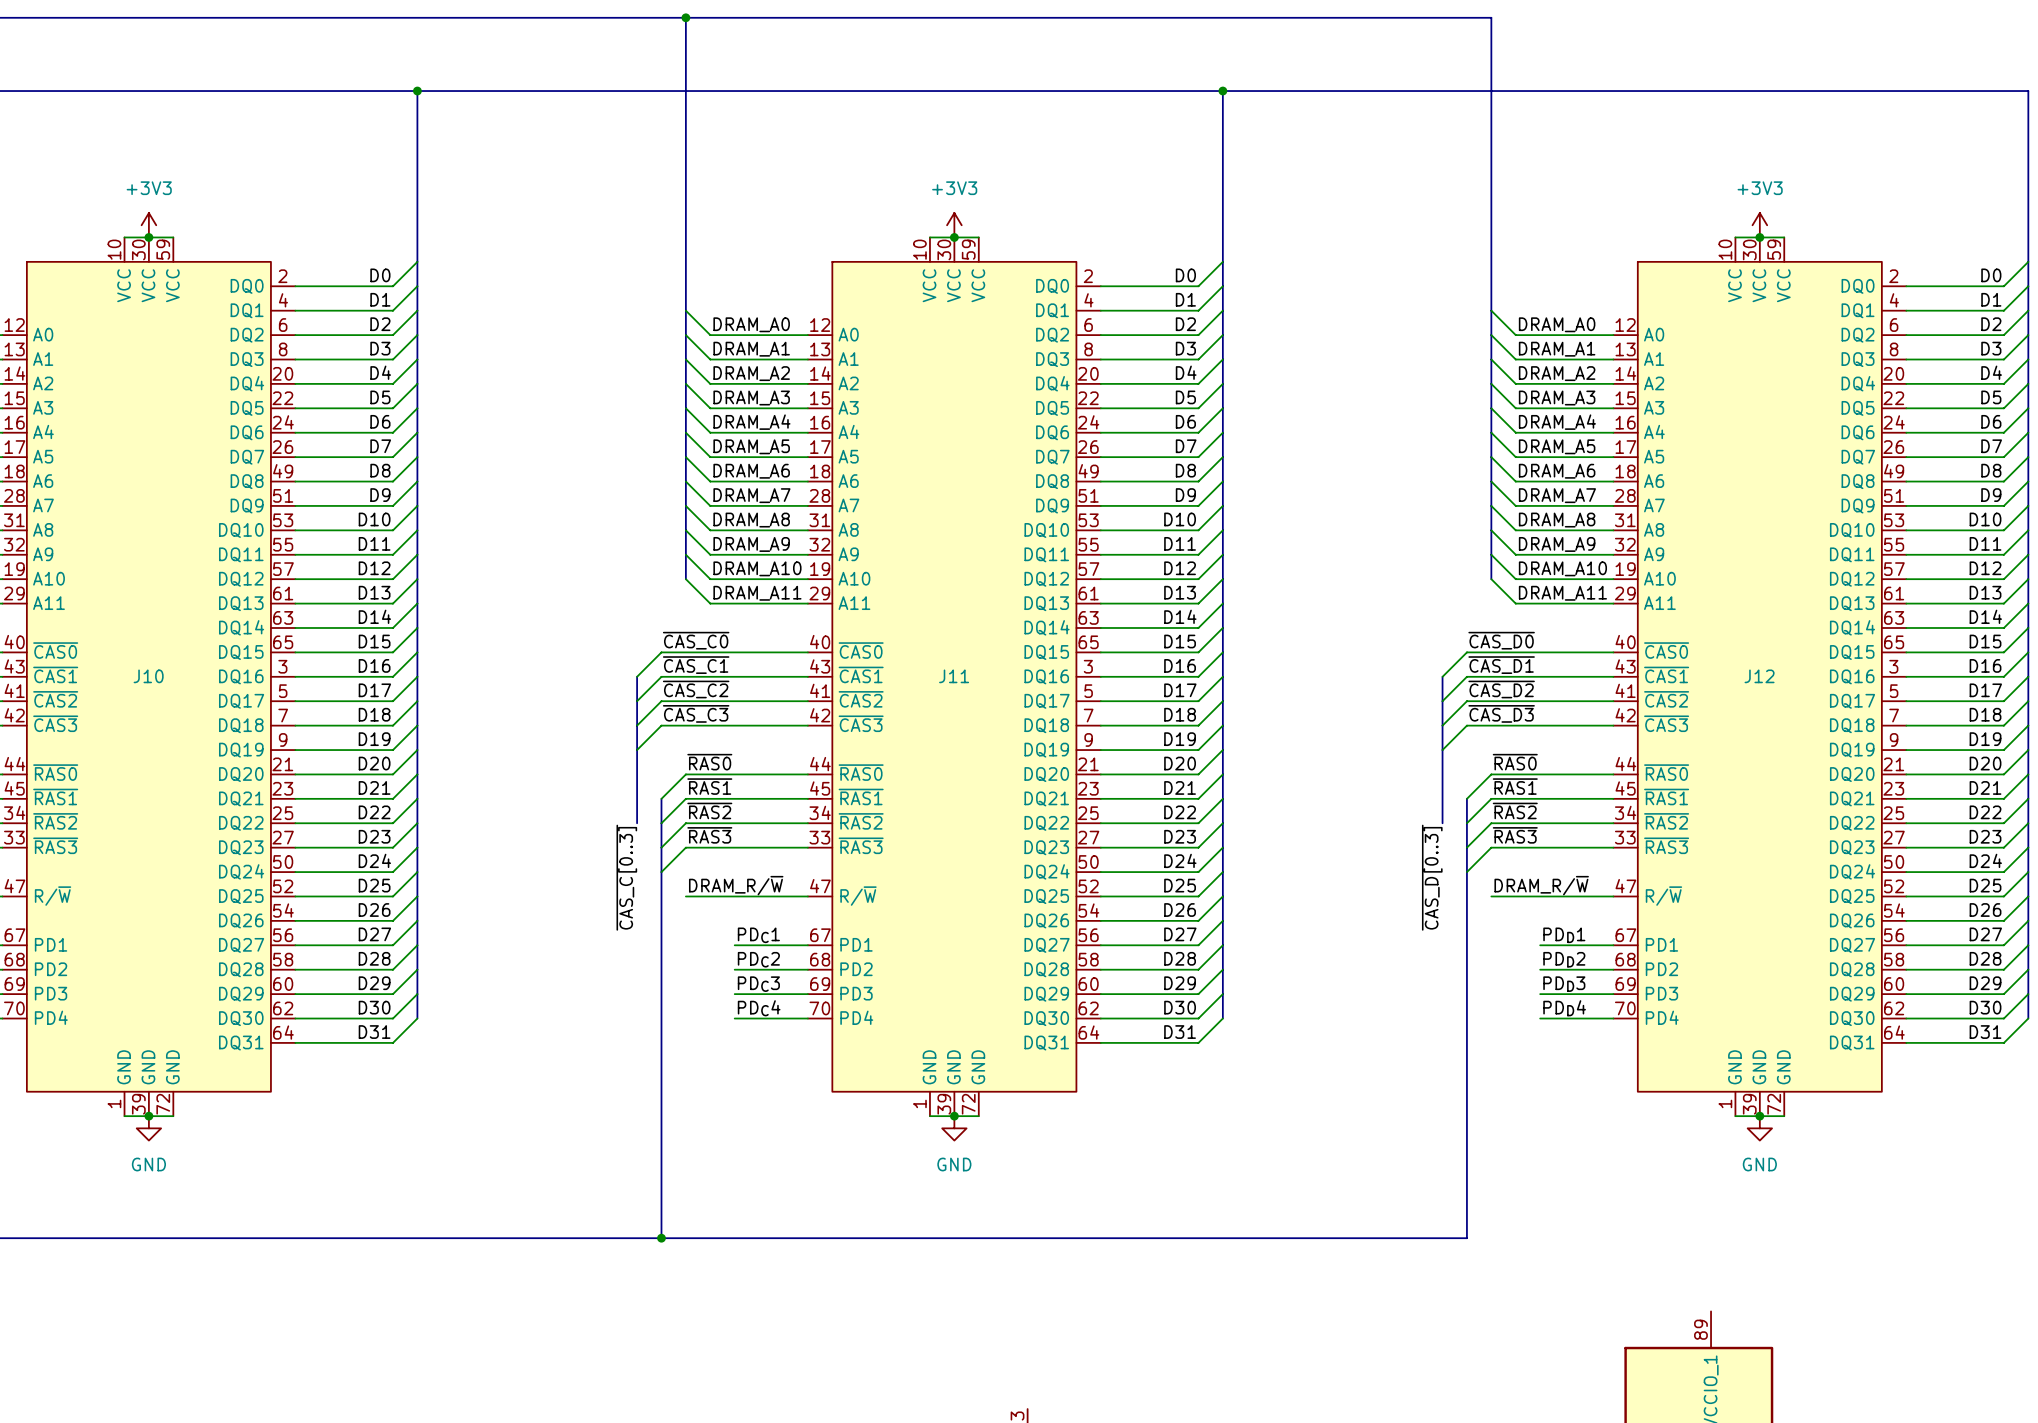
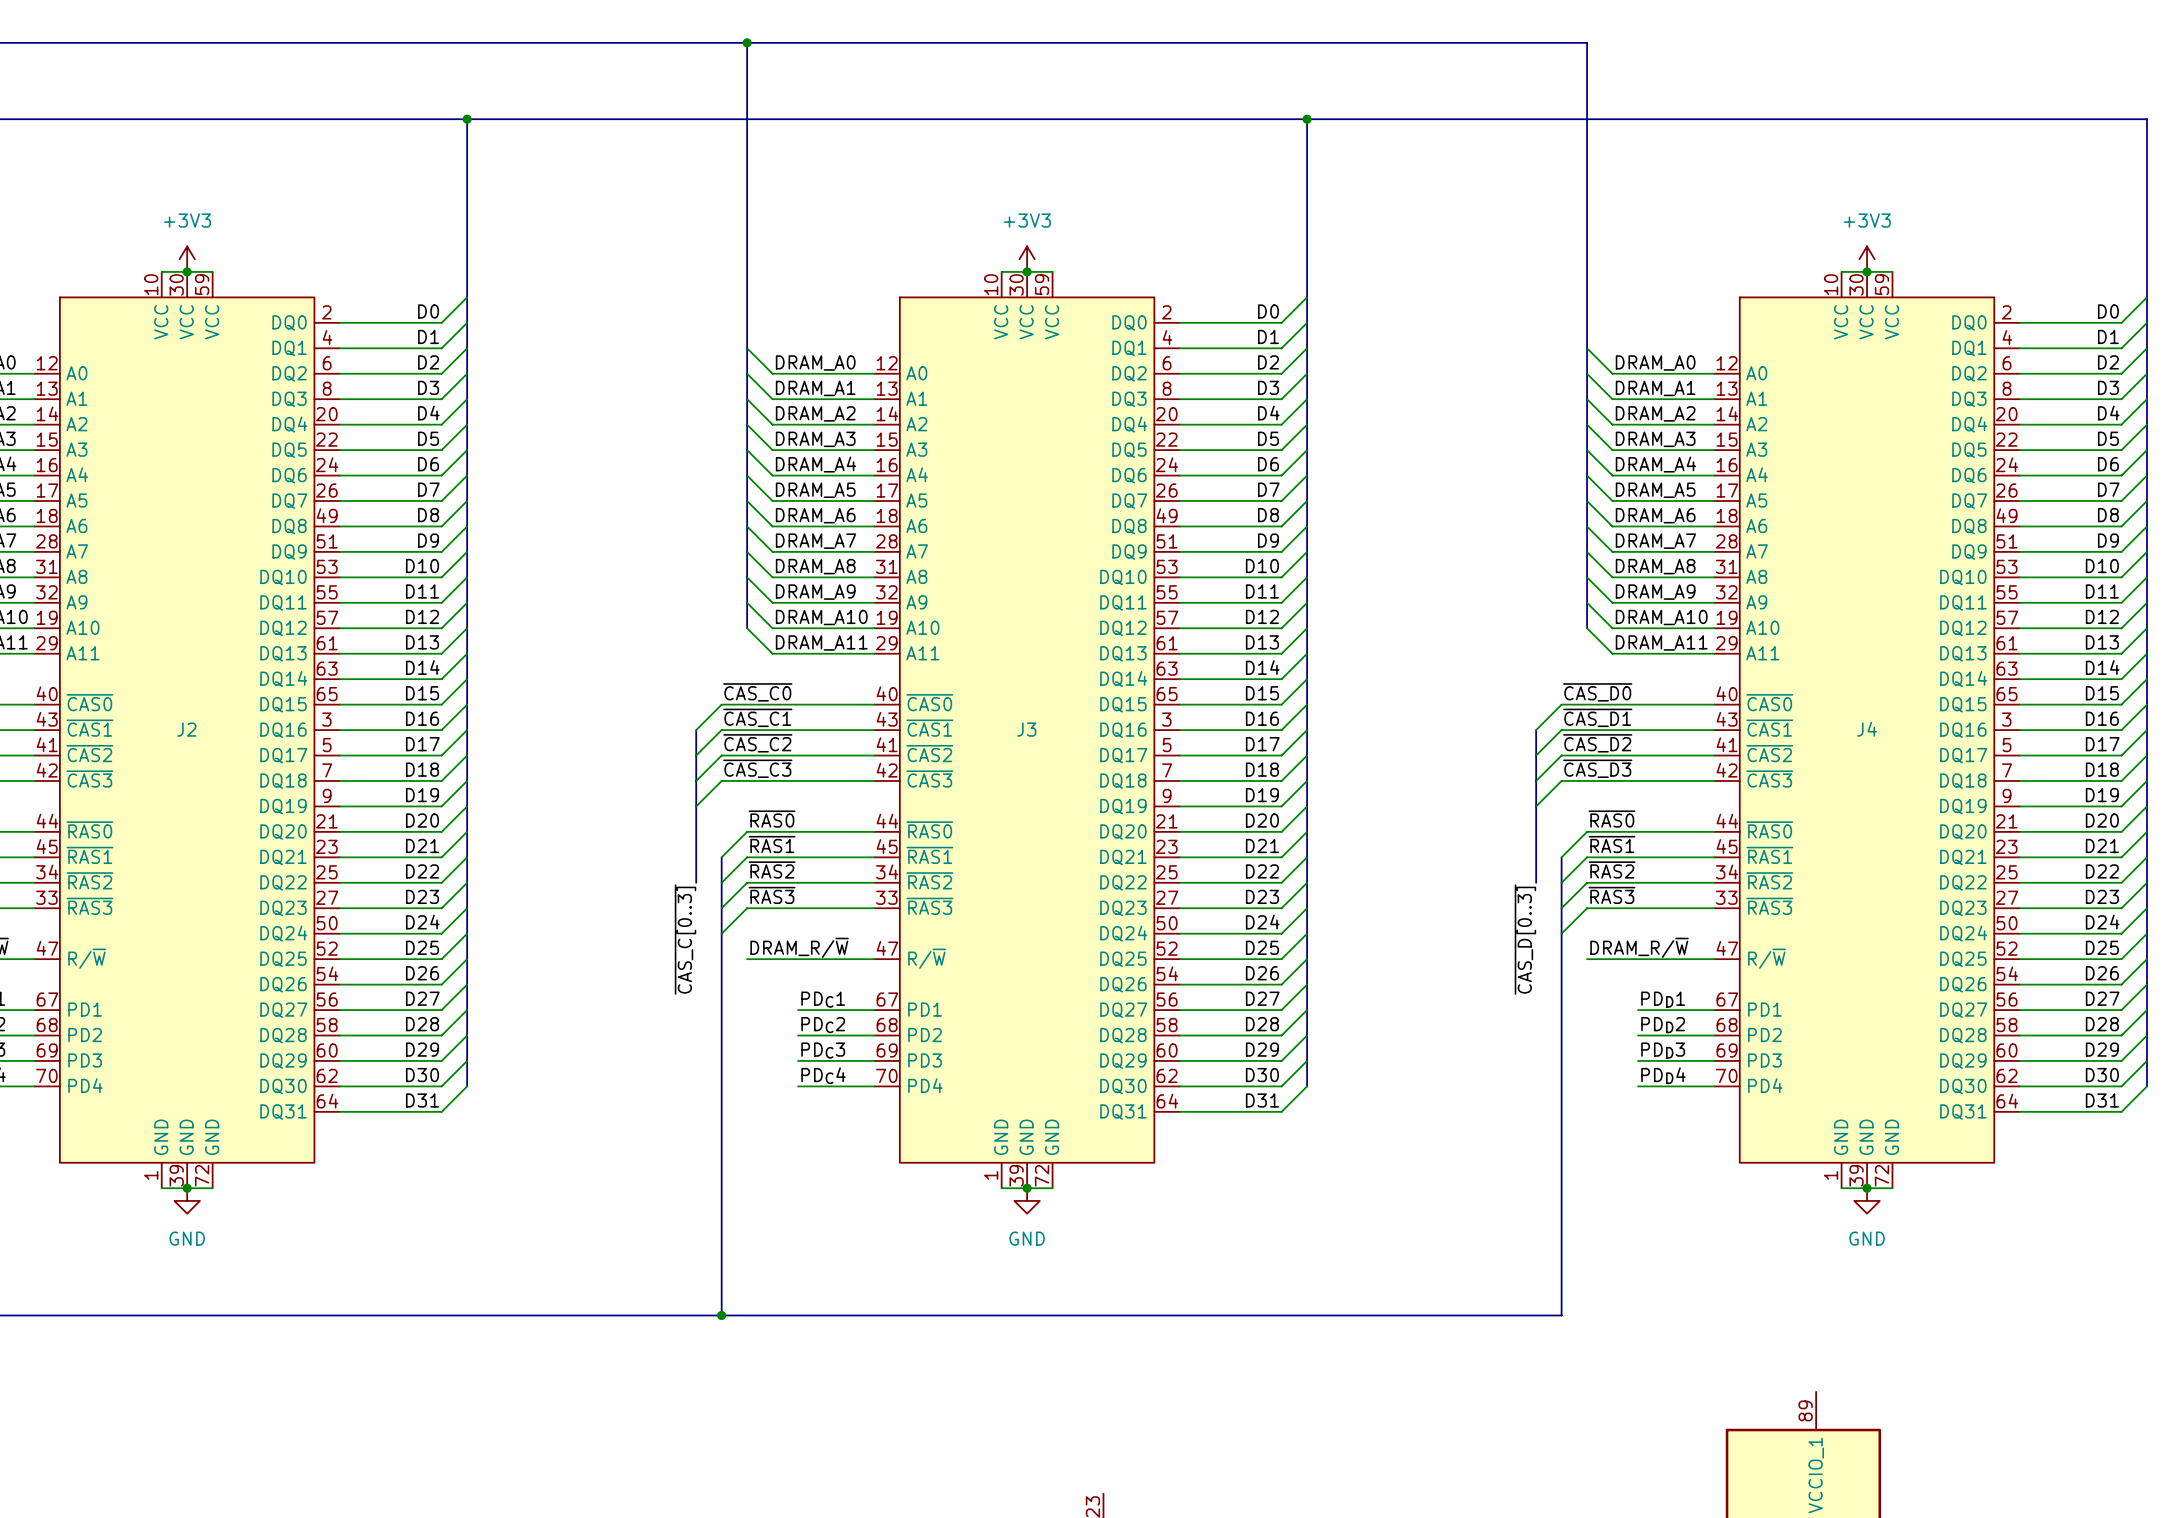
J10 name: J10 (148, 676) -> J2 (186, 729)
J11 name: J11 (954, 676) -> J3 (1026, 729)
J12 name: J12 (1759, 676) -> J4 (1867, 729)

